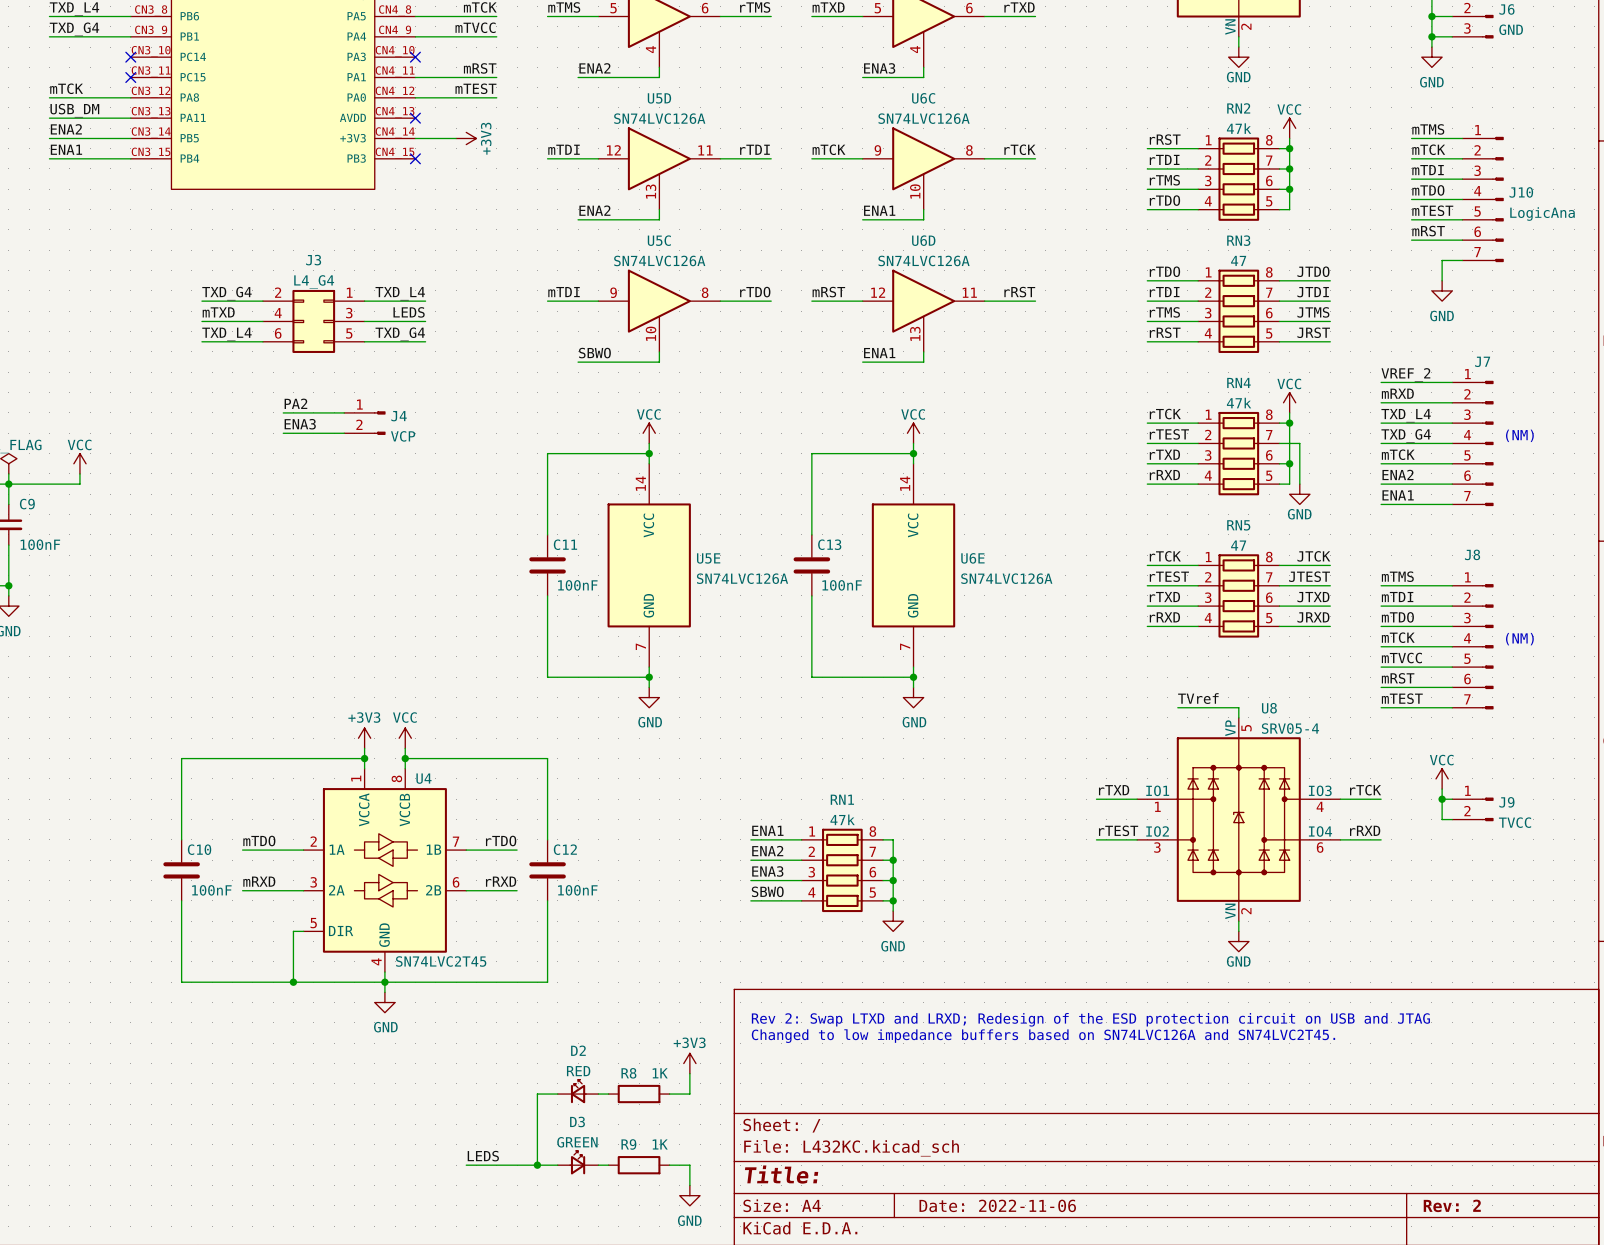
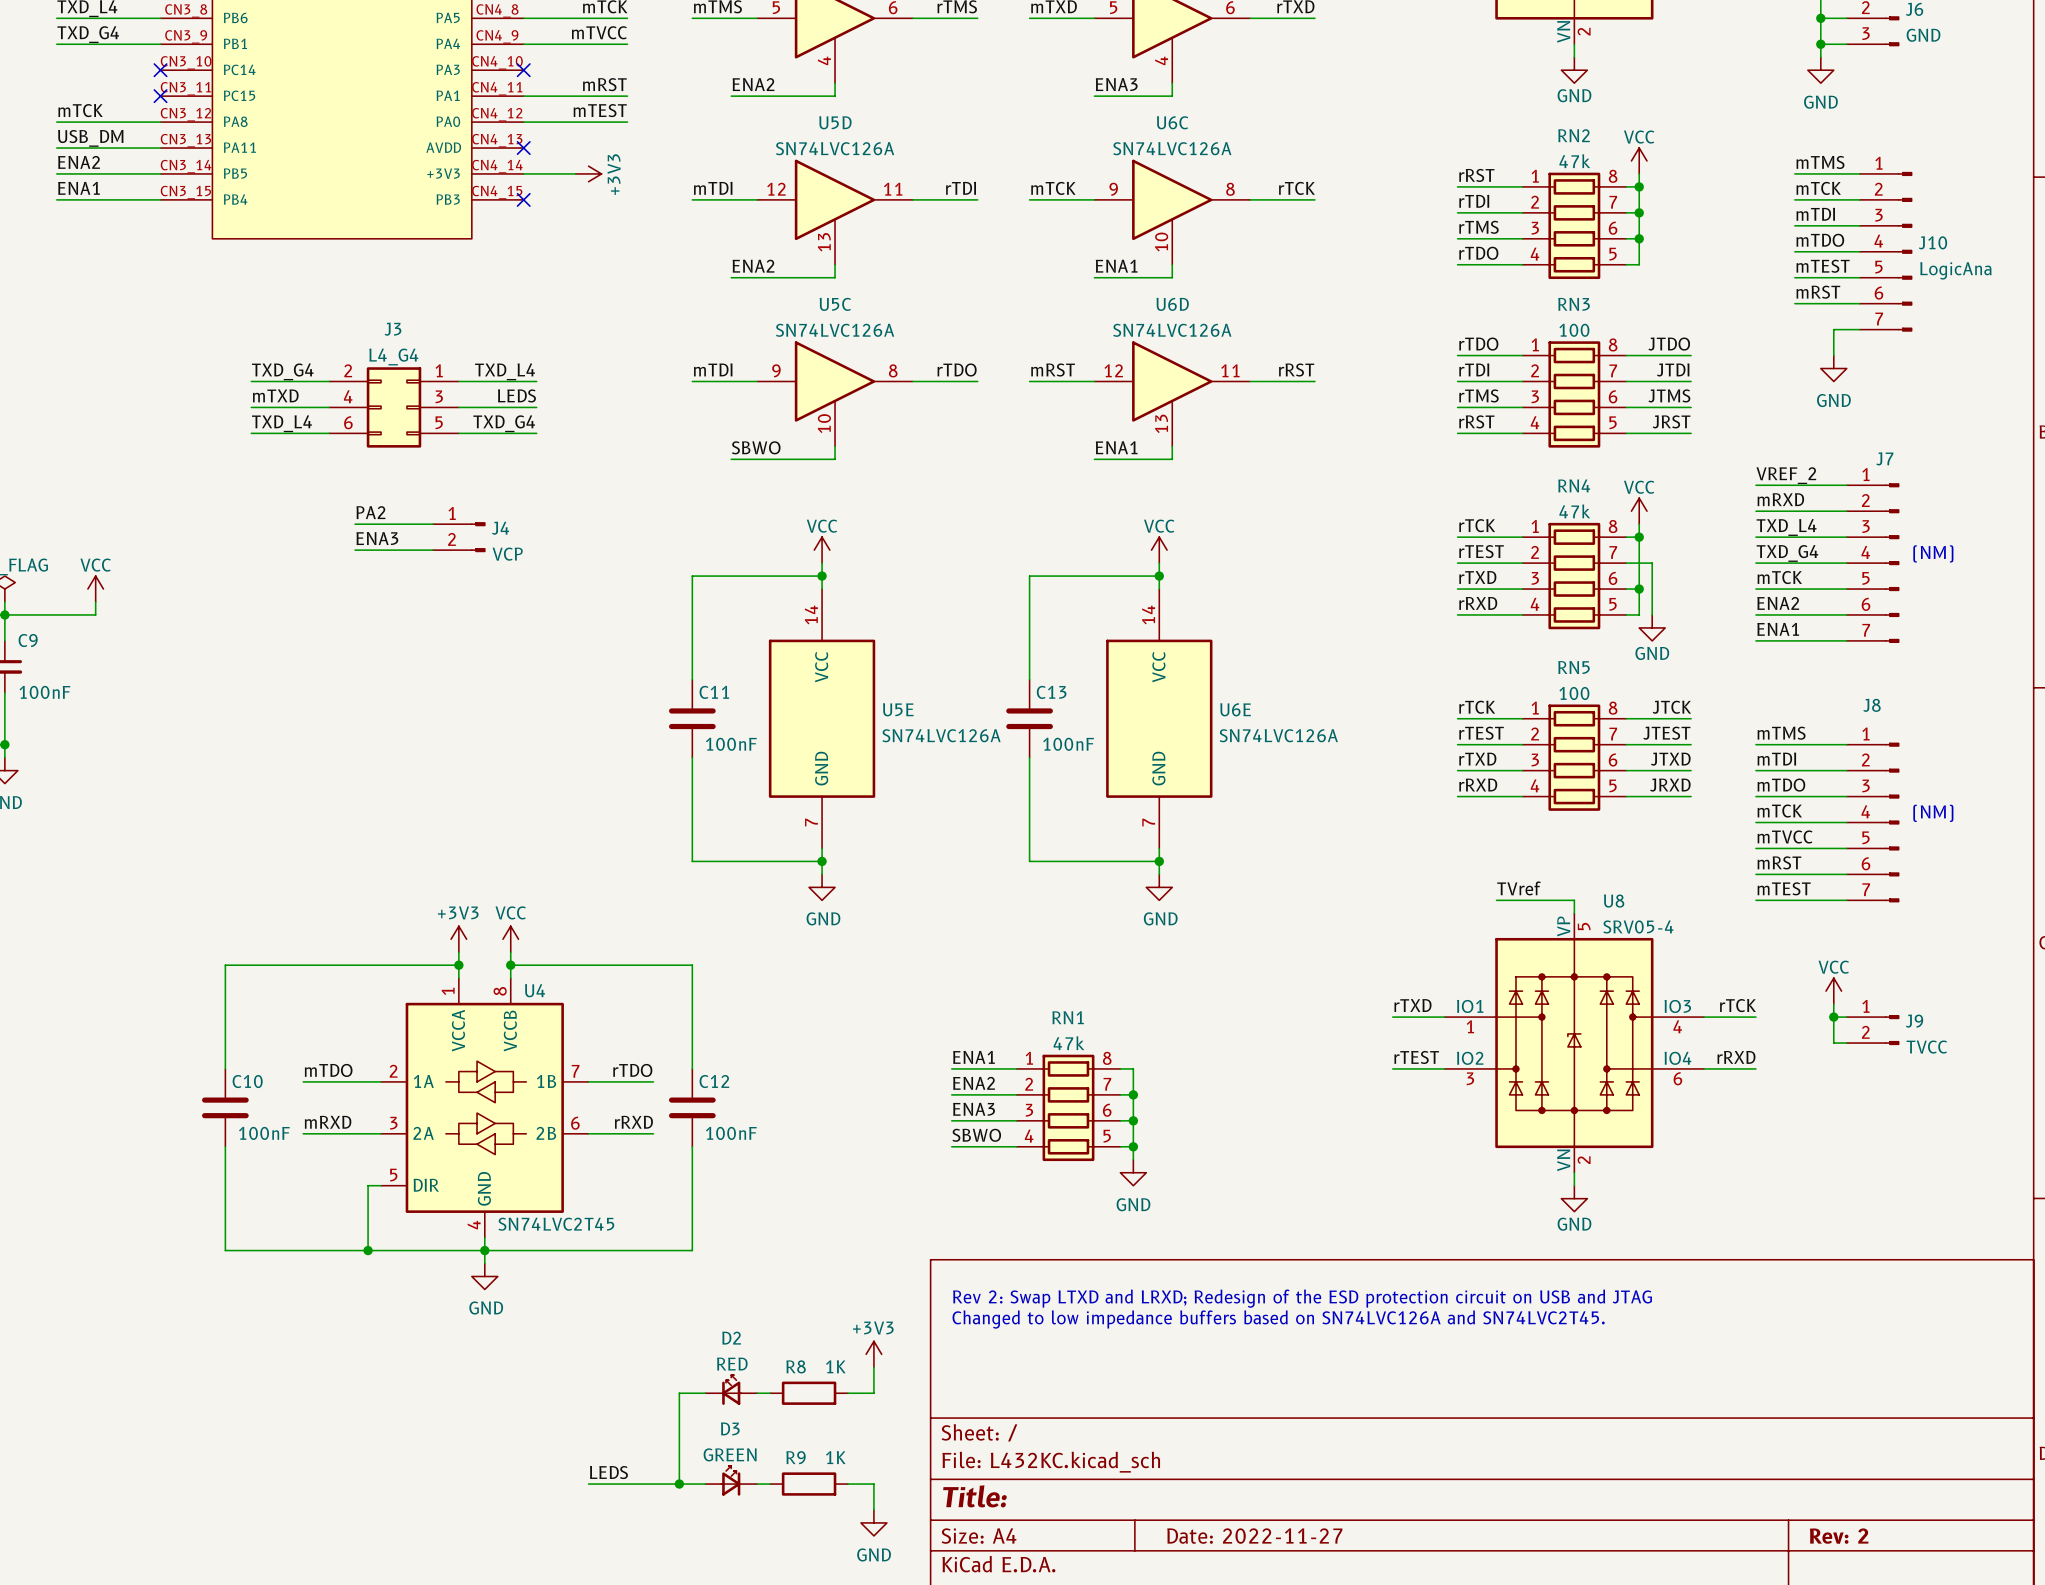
RN3 value: 47 (1238, 260) -> 100 (1574, 330)
RN5 value: 47 (1238, 545) -> 100 (1574, 693)
title block: Date: 2022-11-06 (997, 1205) -> Date: 2022-11-27 (1254, 1536)

